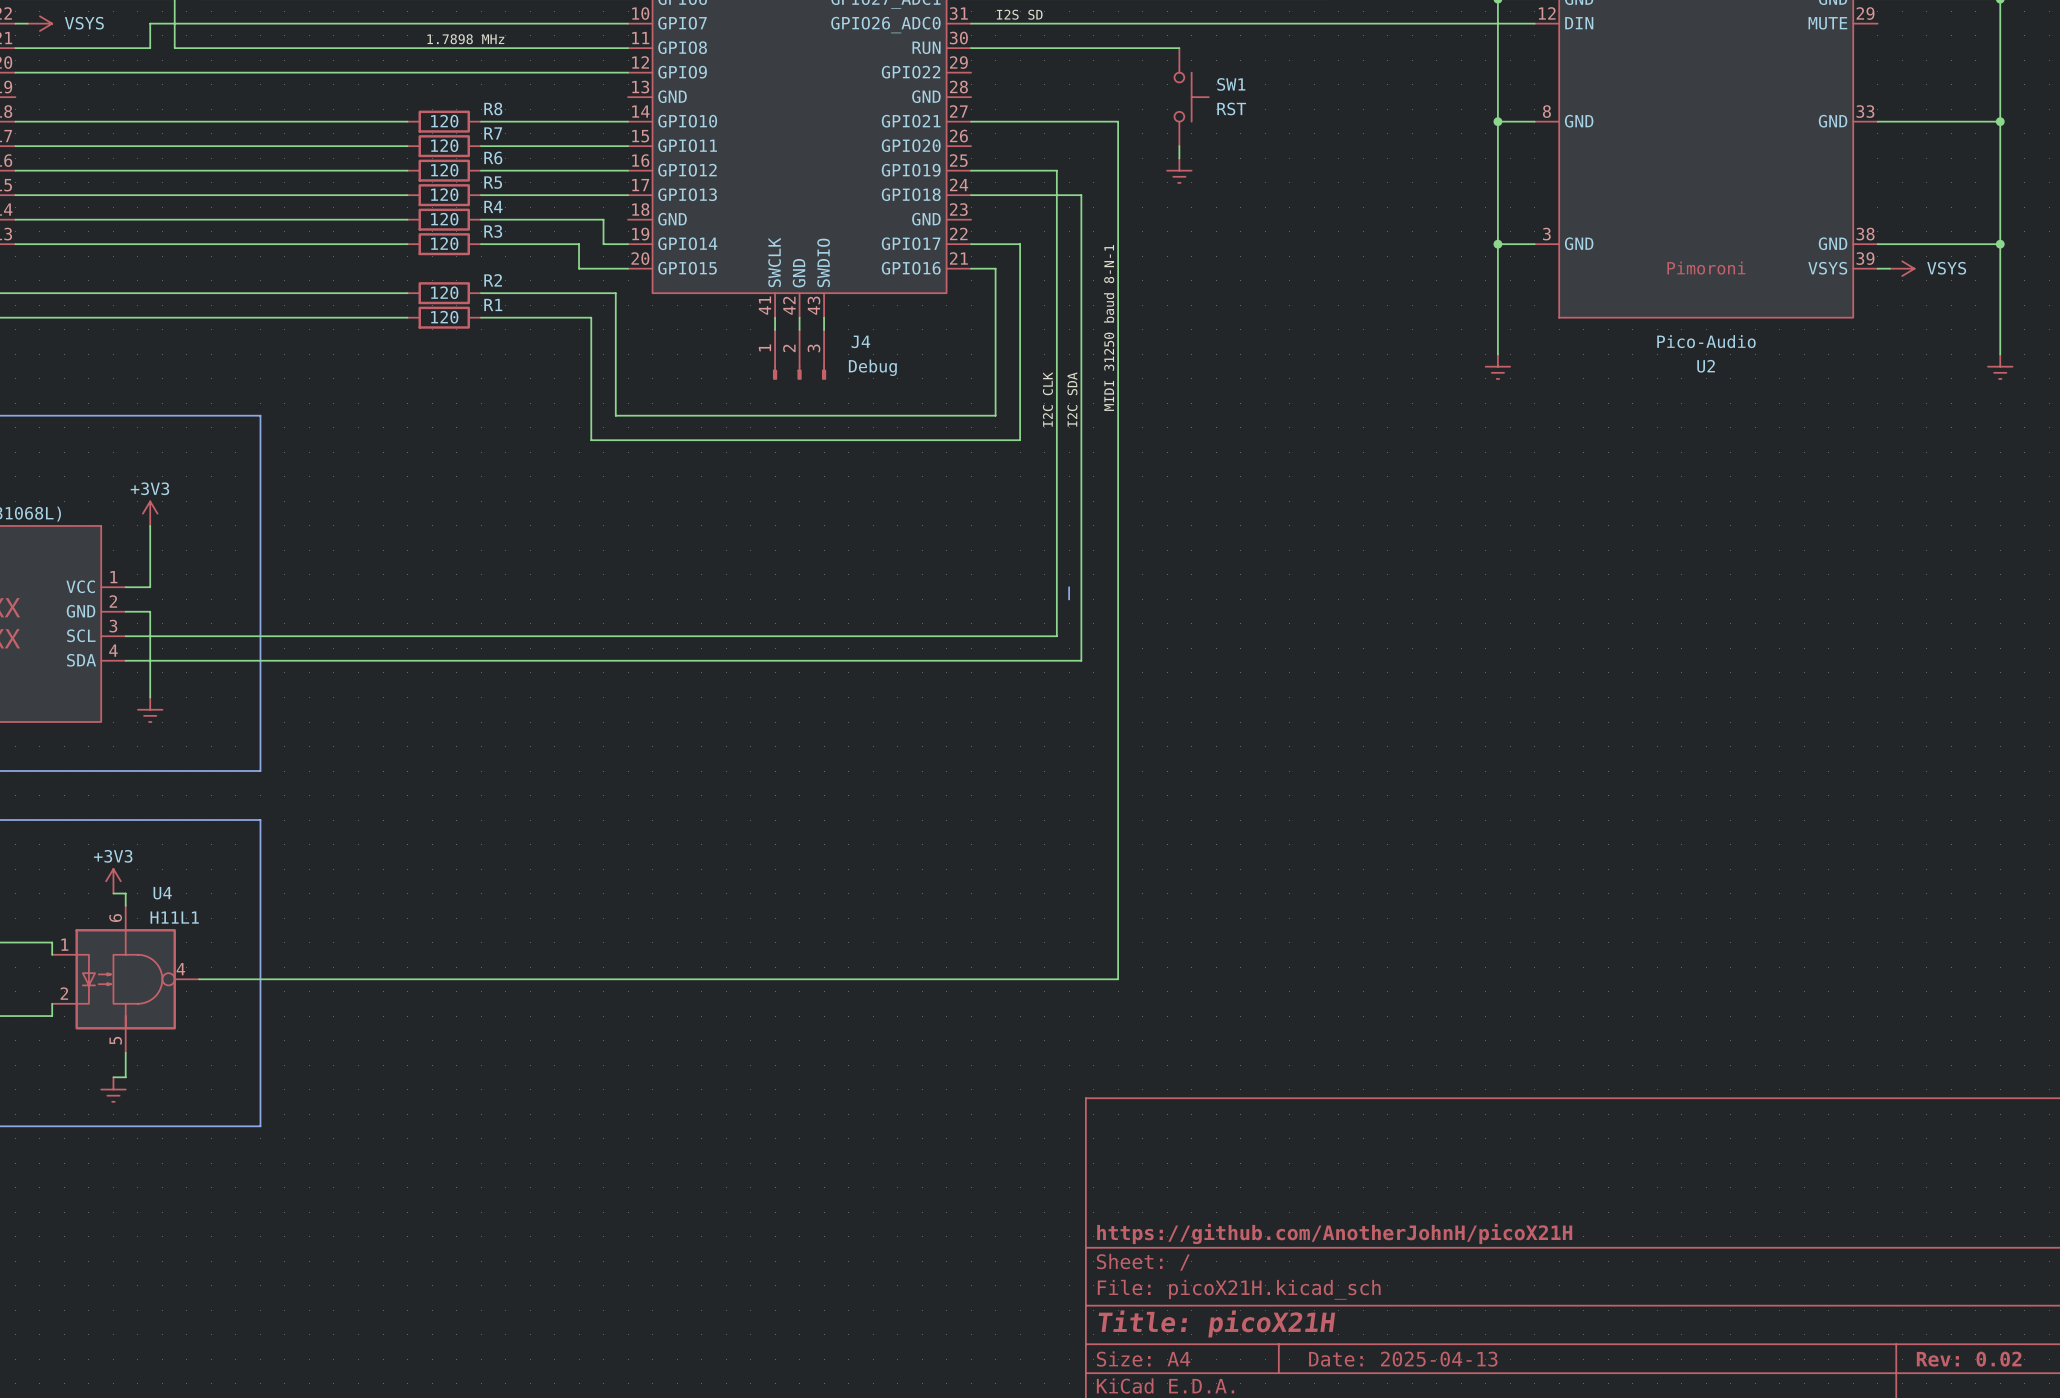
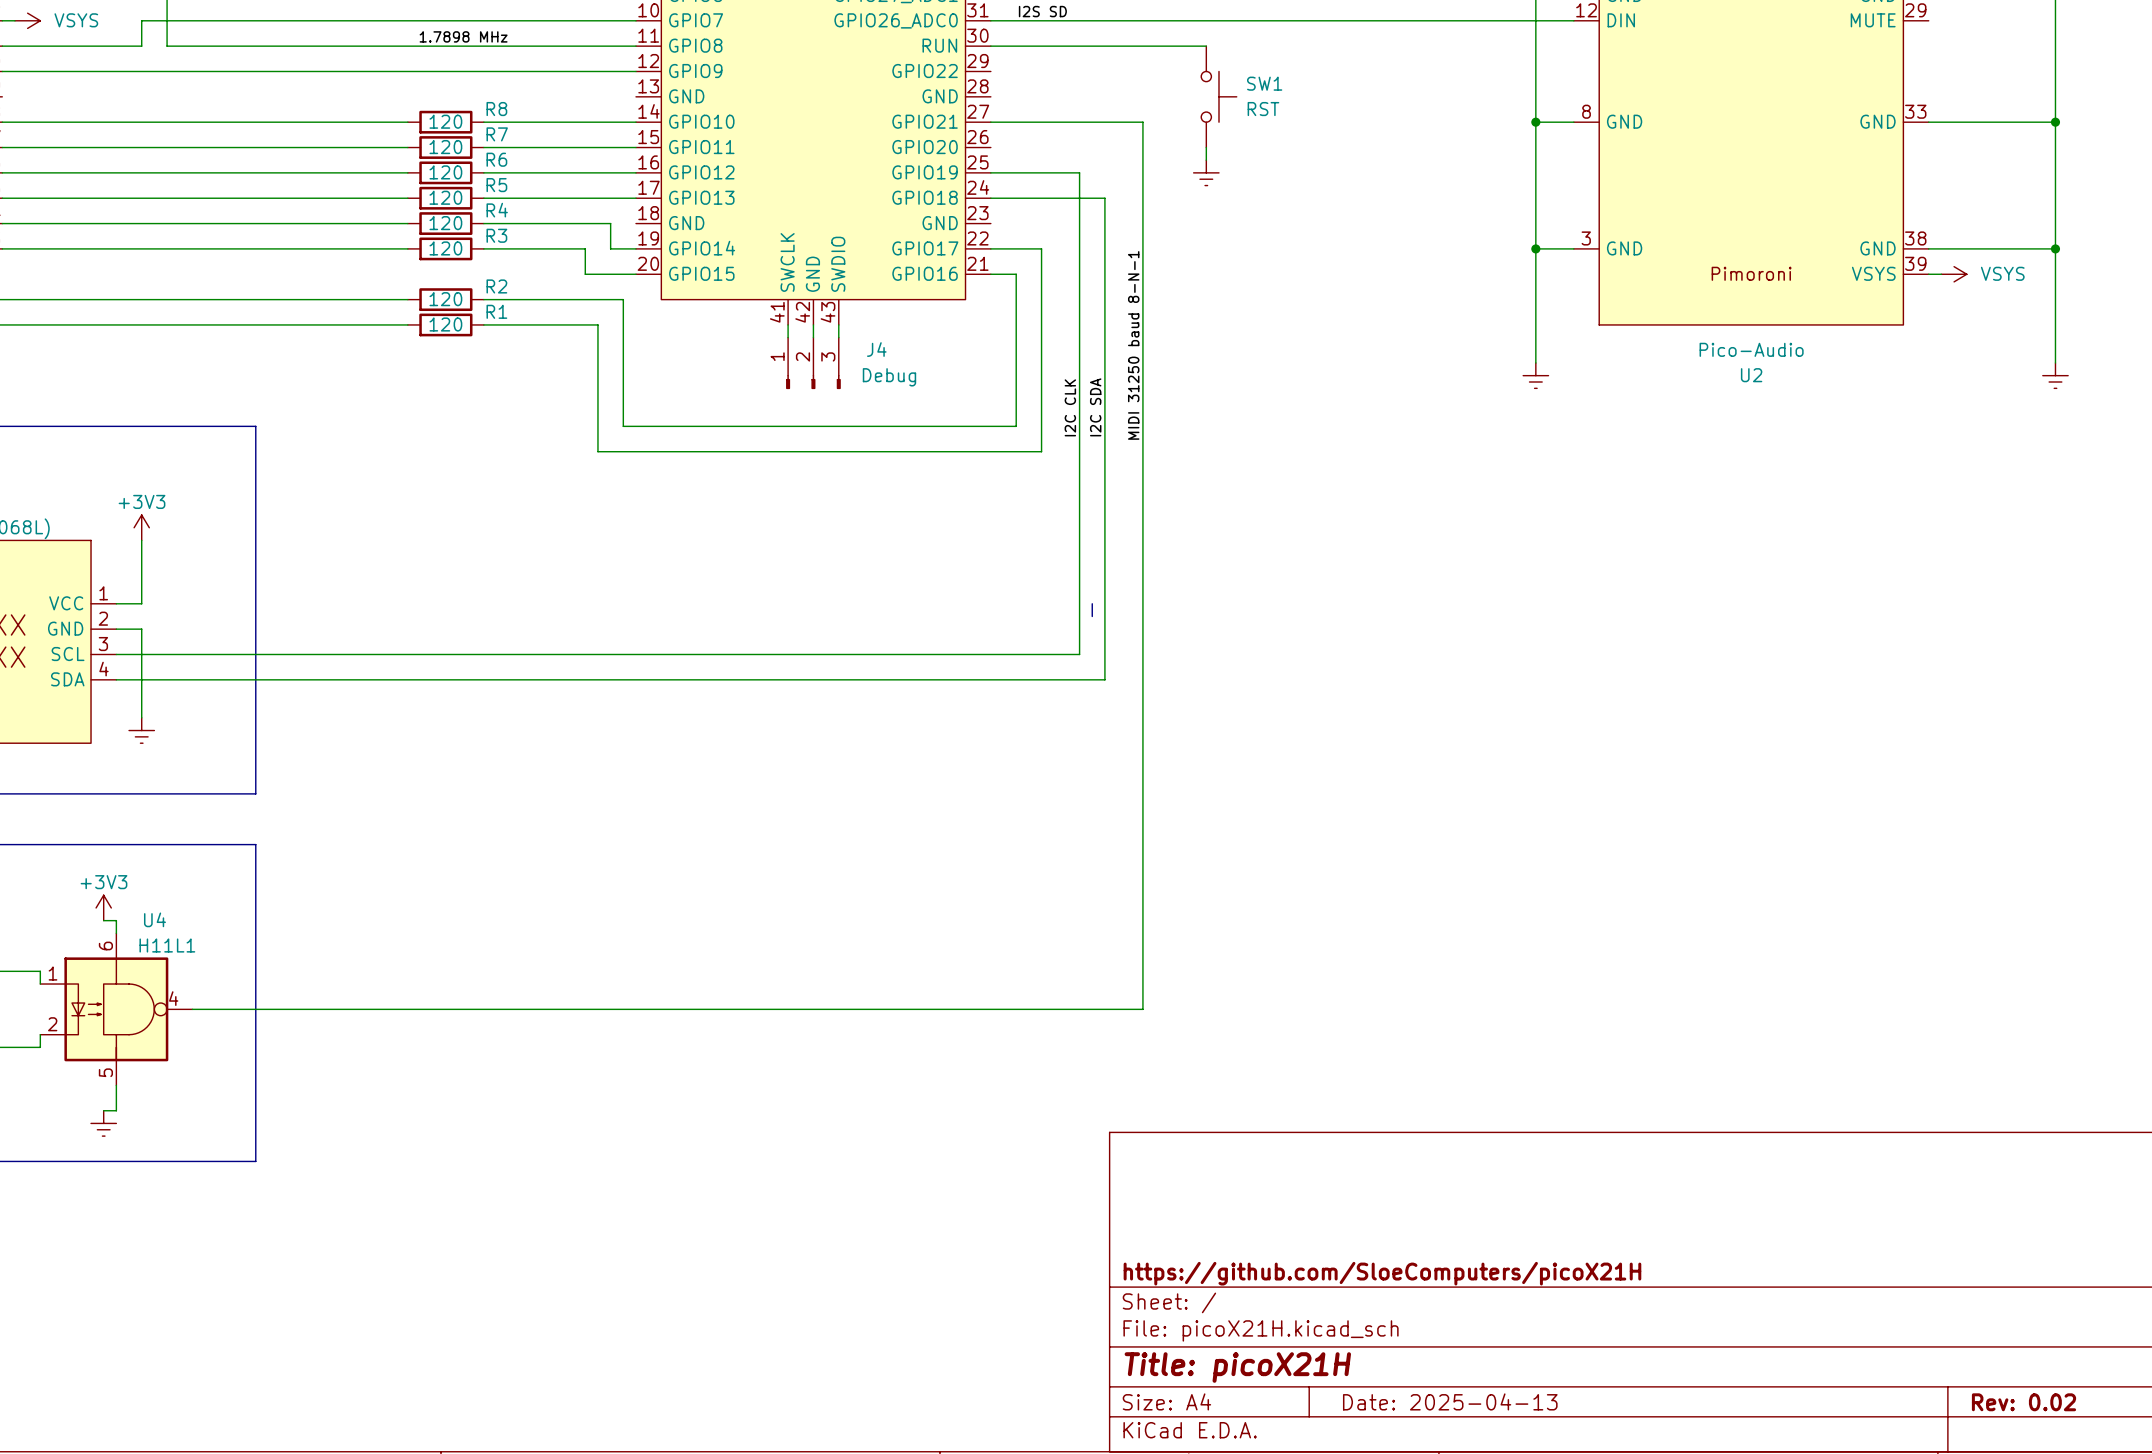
title block: https://github.com/AnotherJohnH/picoX21H (1334, 1233) -> https://github.com/SloeComputers/picoX21H (1382, 1273)

